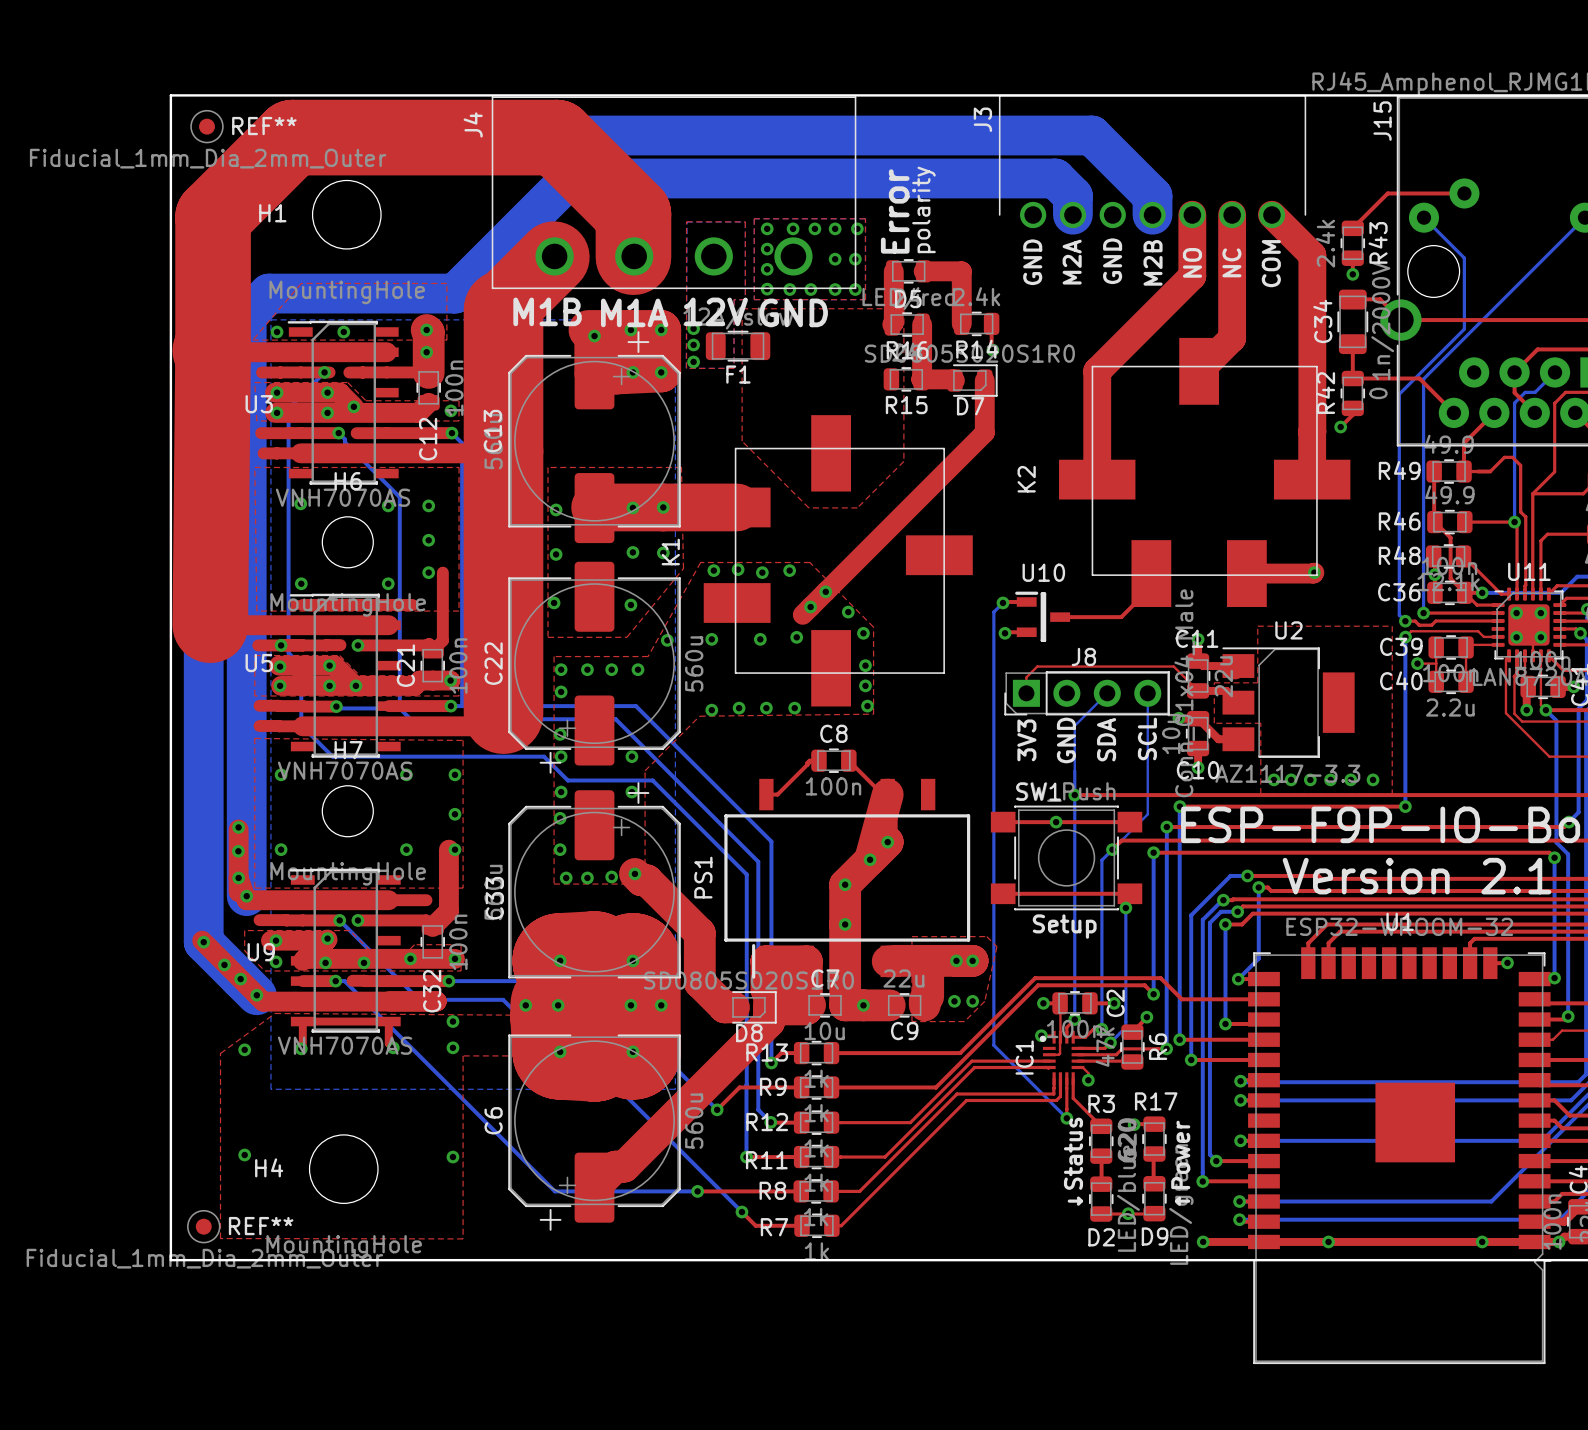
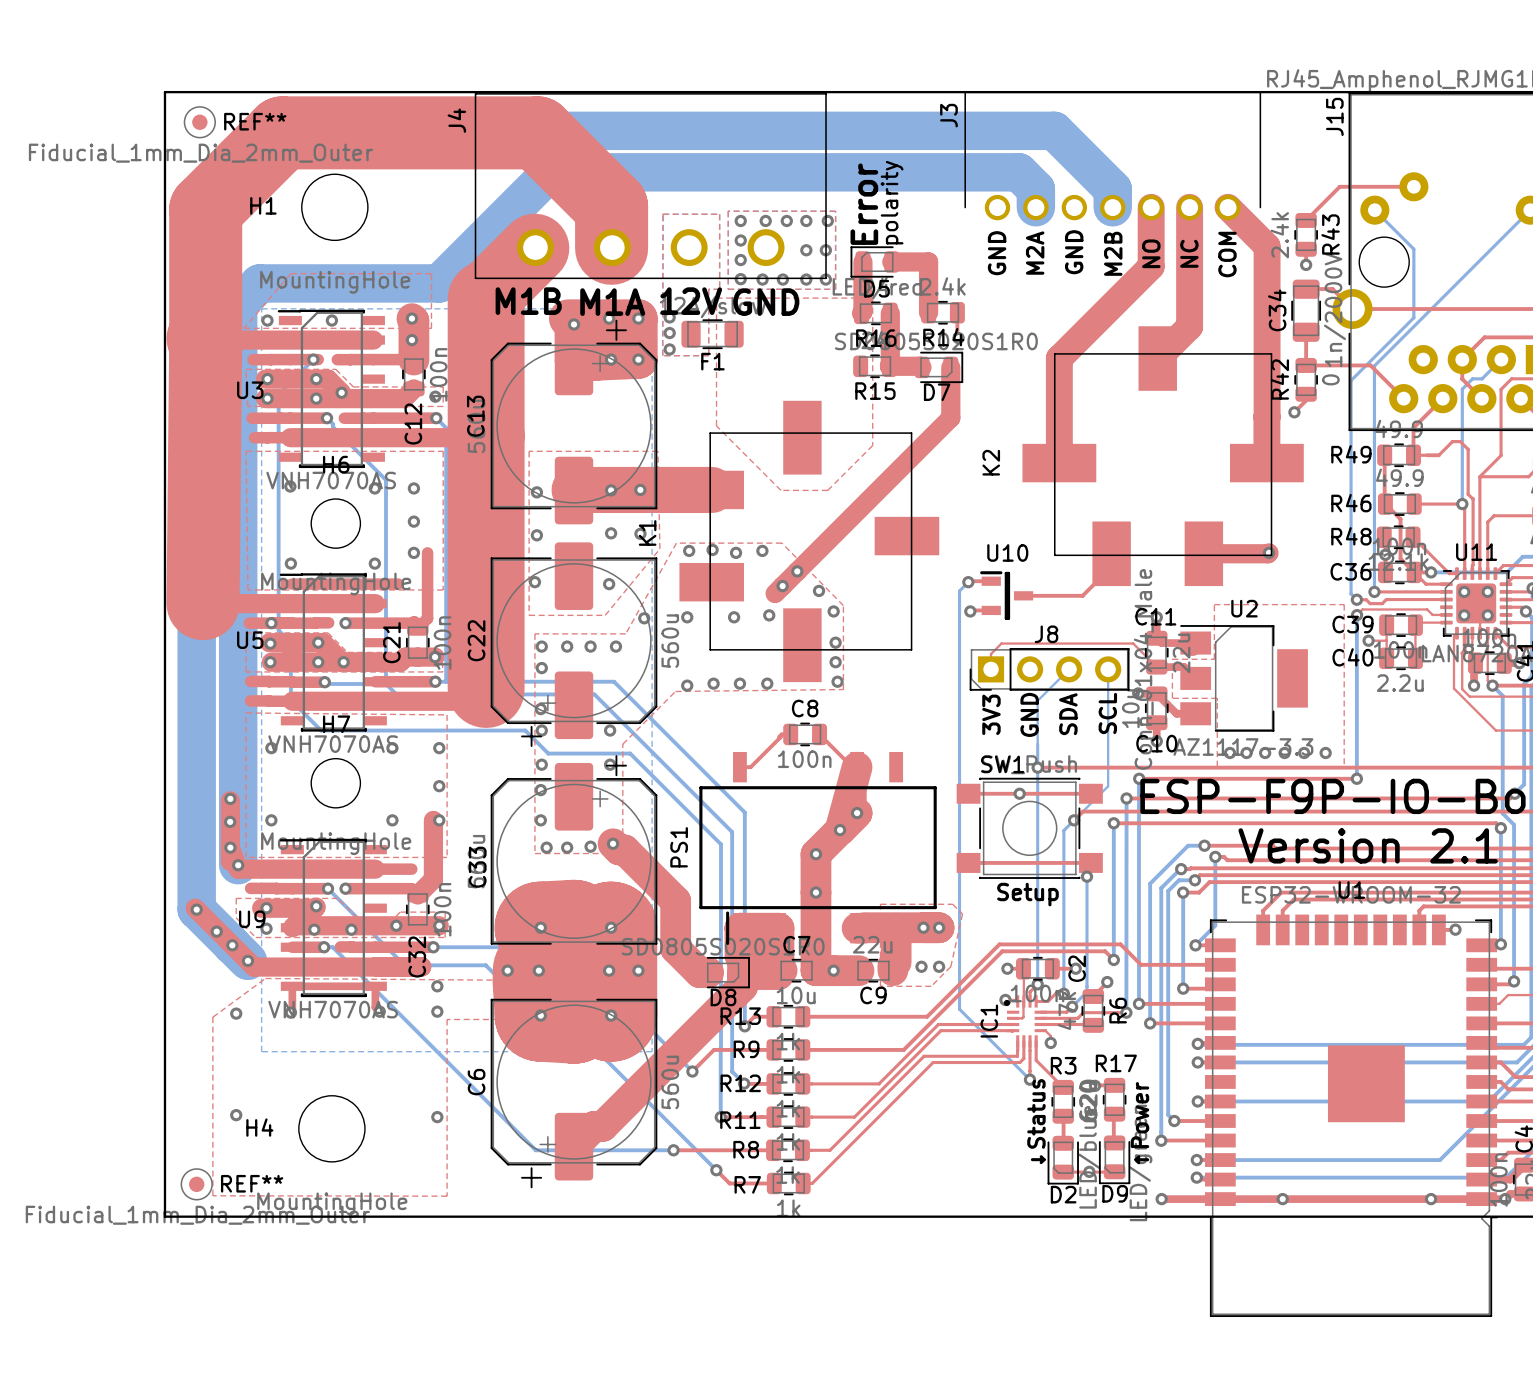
D5 footprint: [886, 259, 932, 284] -> [850, 246, 900, 278]
D2 footprint: [1088, 1176, 1114, 1222] -> [1047, 1135, 1079, 1185]
D9 footprint: [1142, 1176, 1167, 1222] -> [1098, 1135, 1131, 1185]

